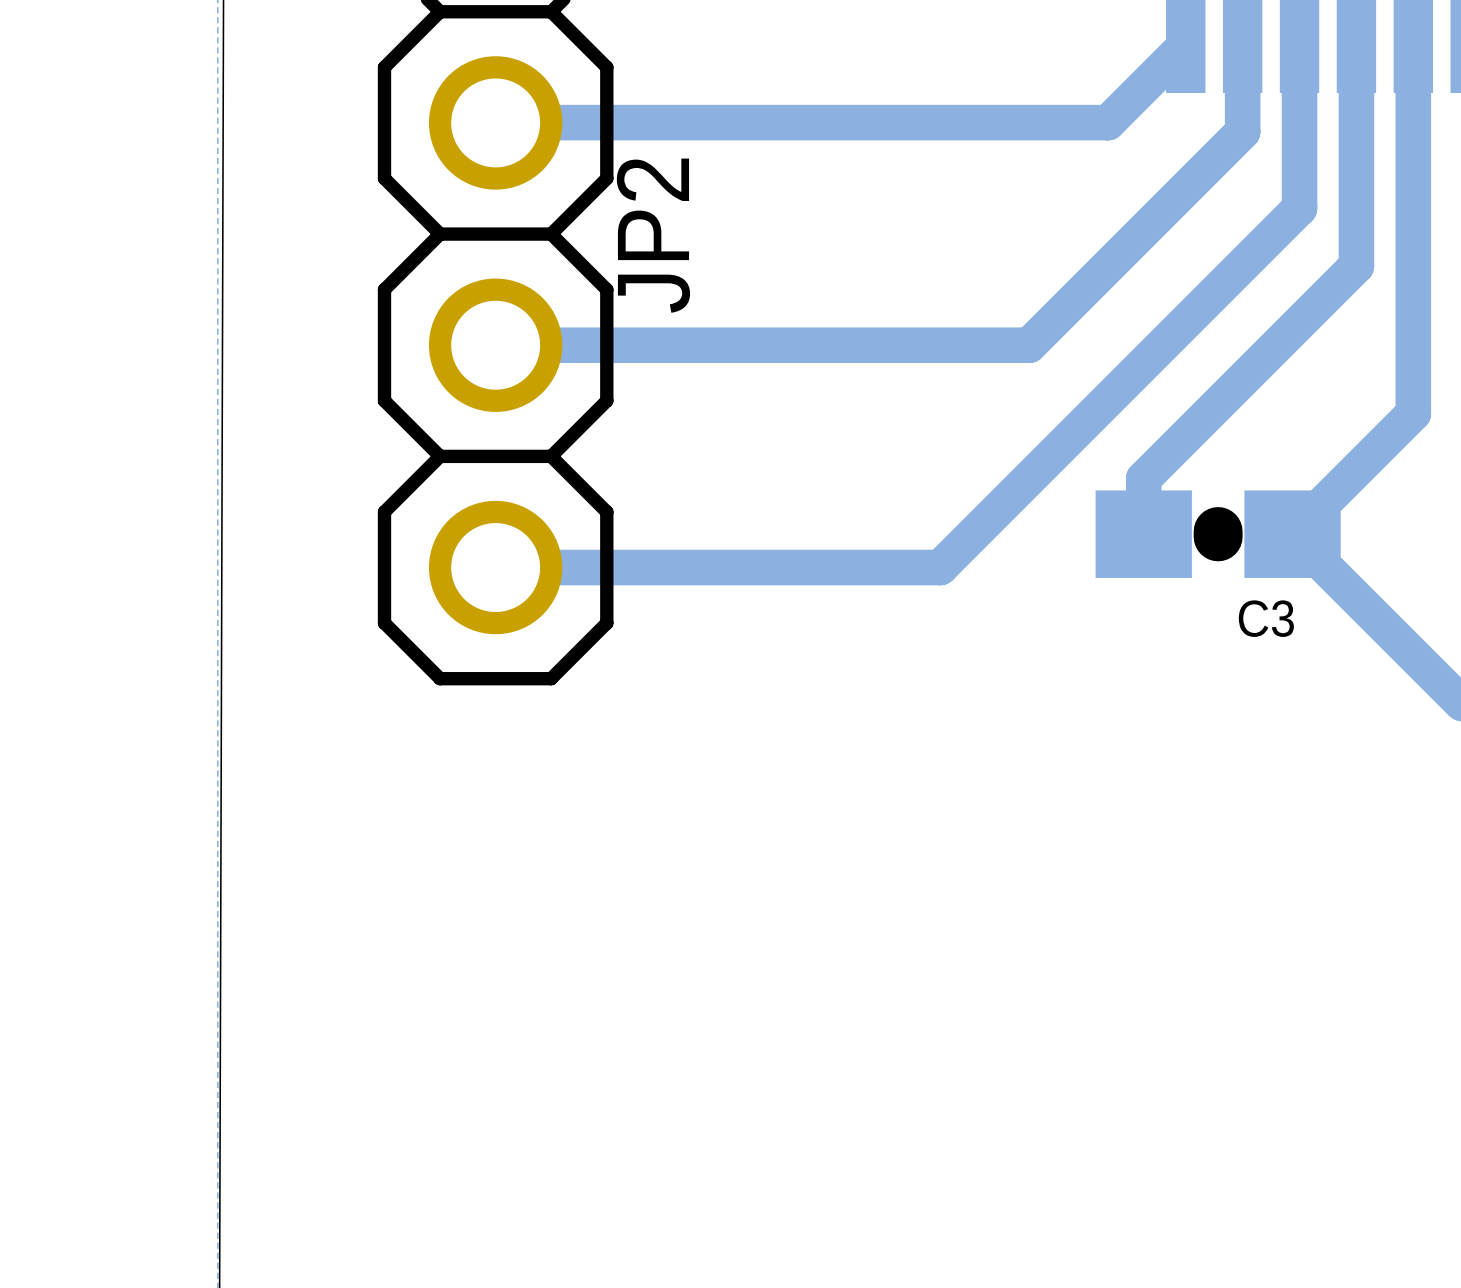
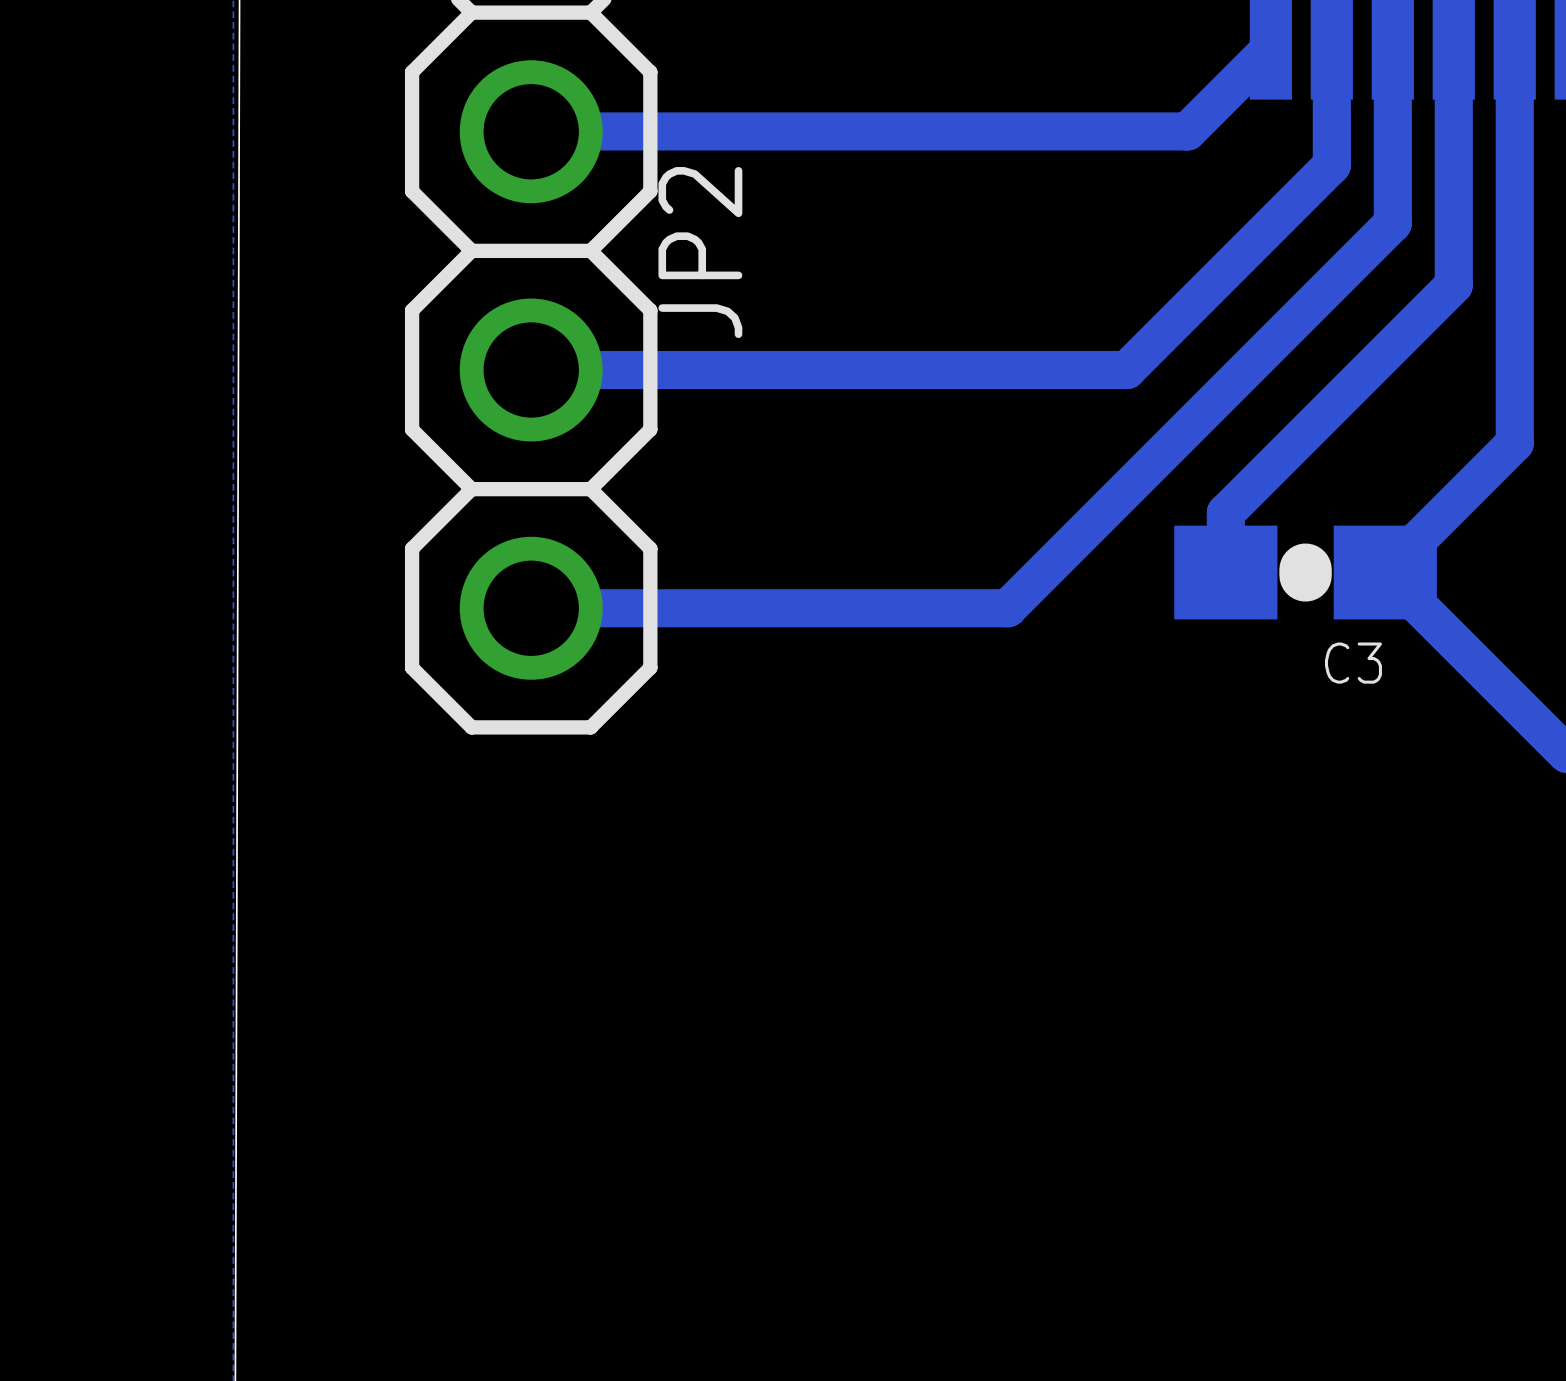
track: (1242, 131) (1029, 345) -> (1331, 141) (1331, 165) (1126, 370) (1103, 370)

